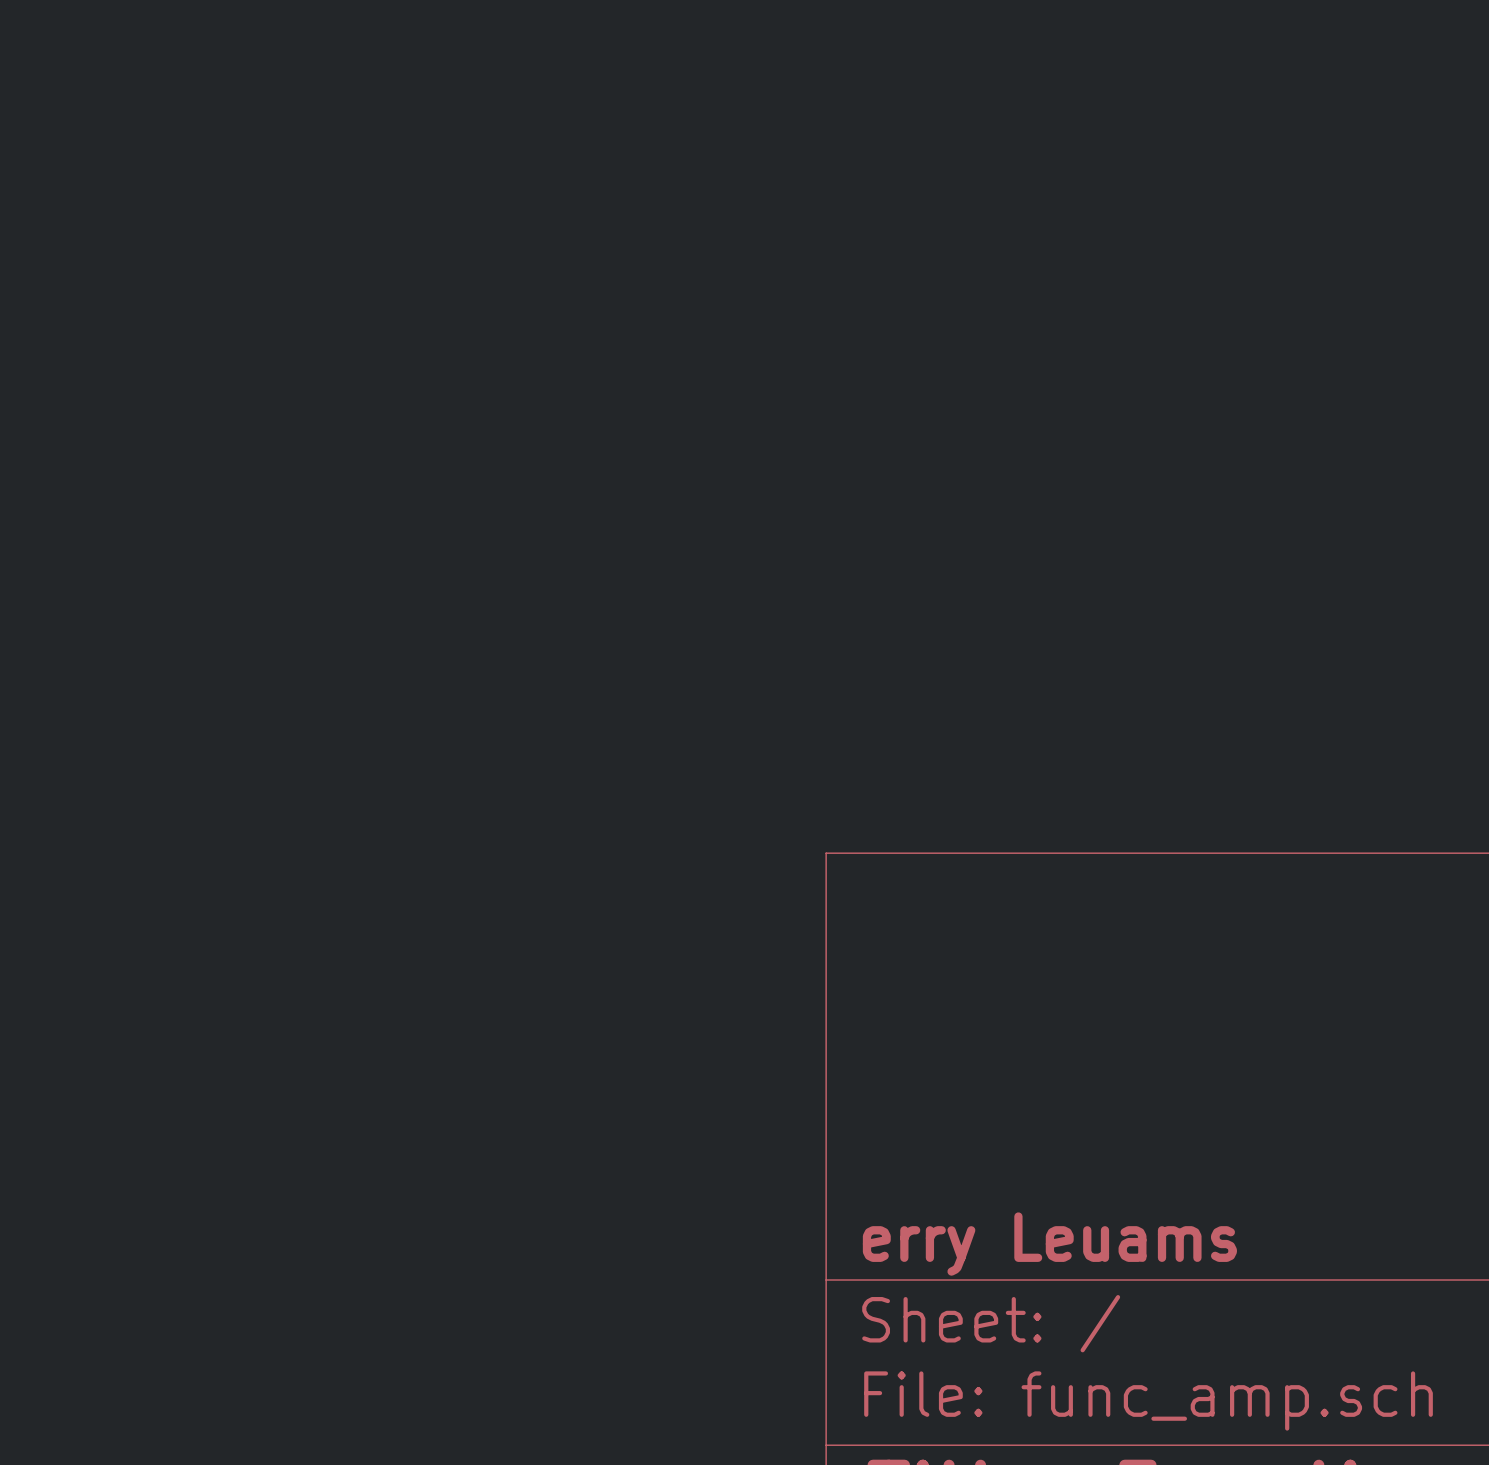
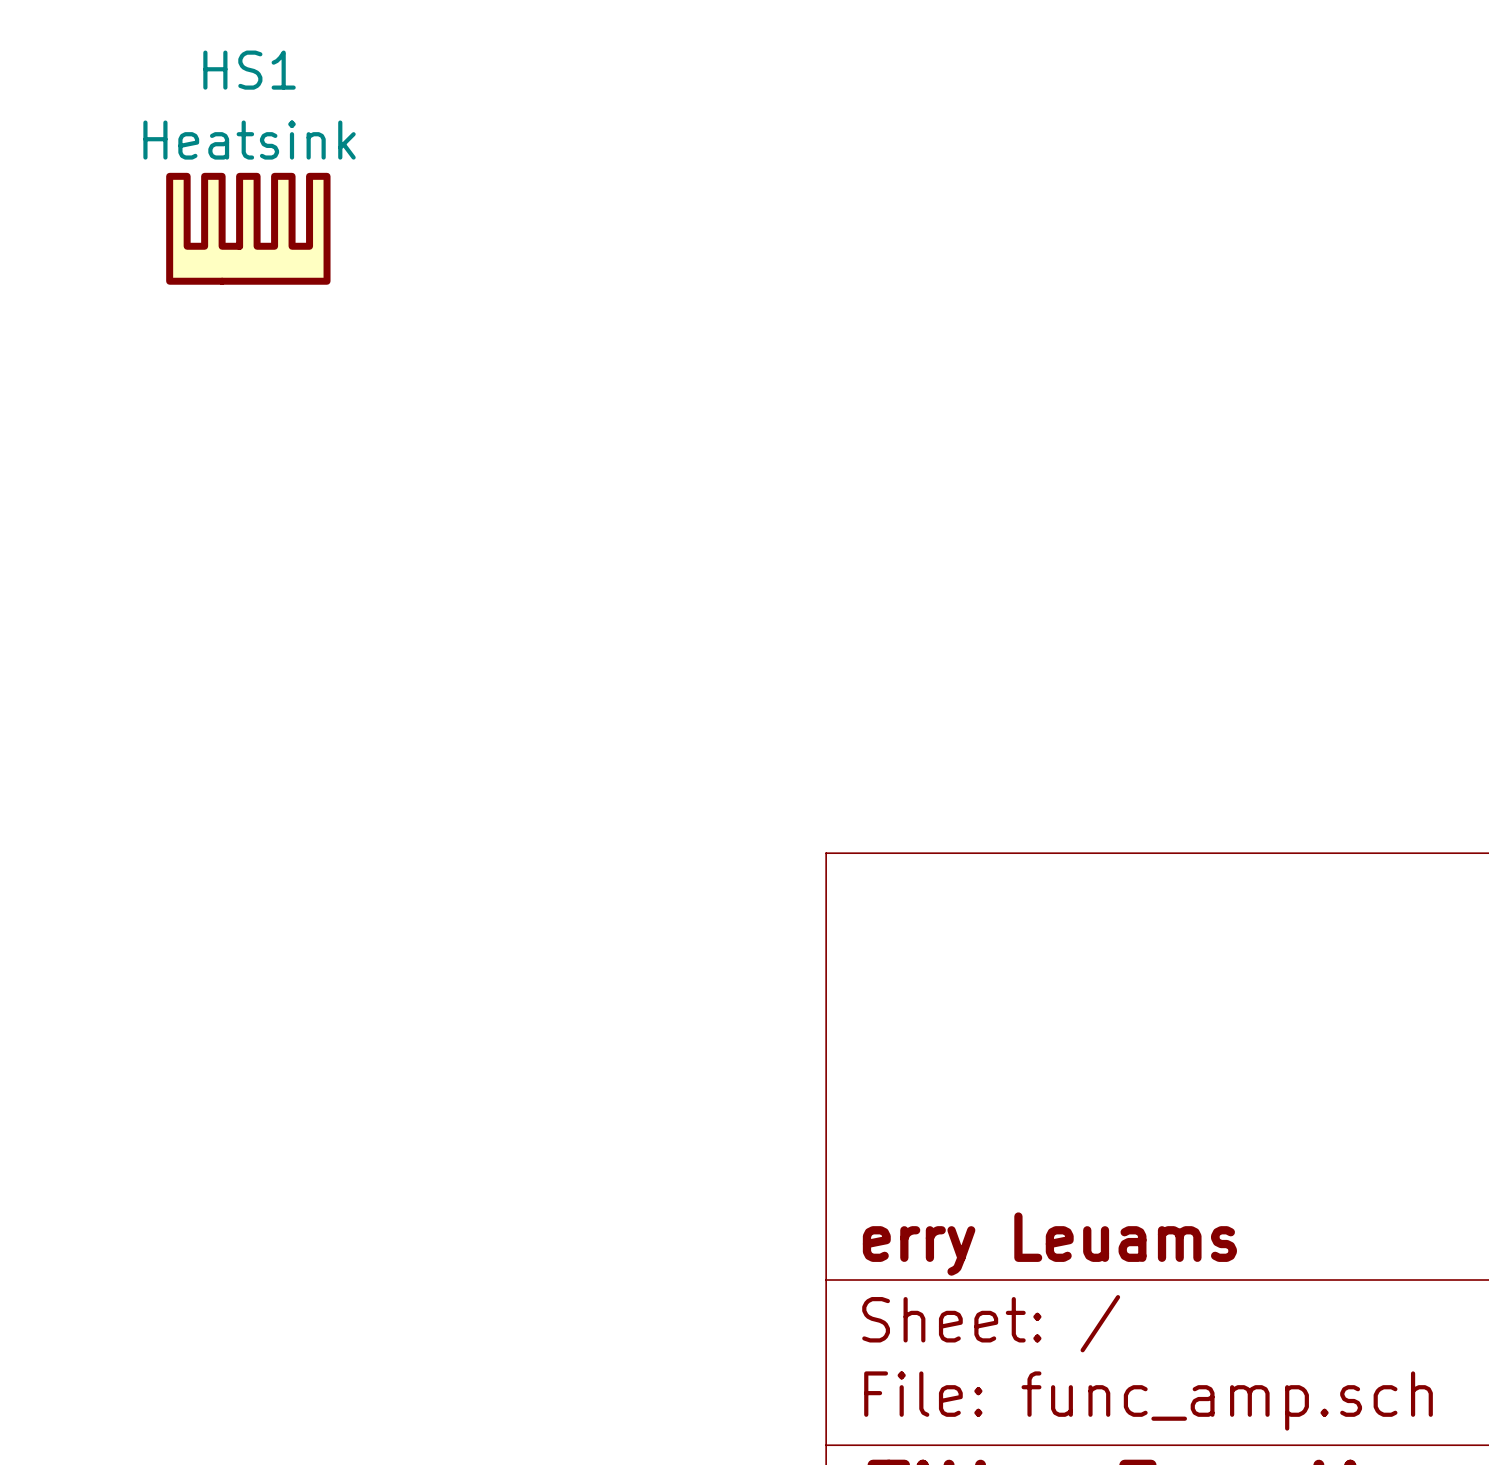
HS1: none -> Heatsink (248, 228)

